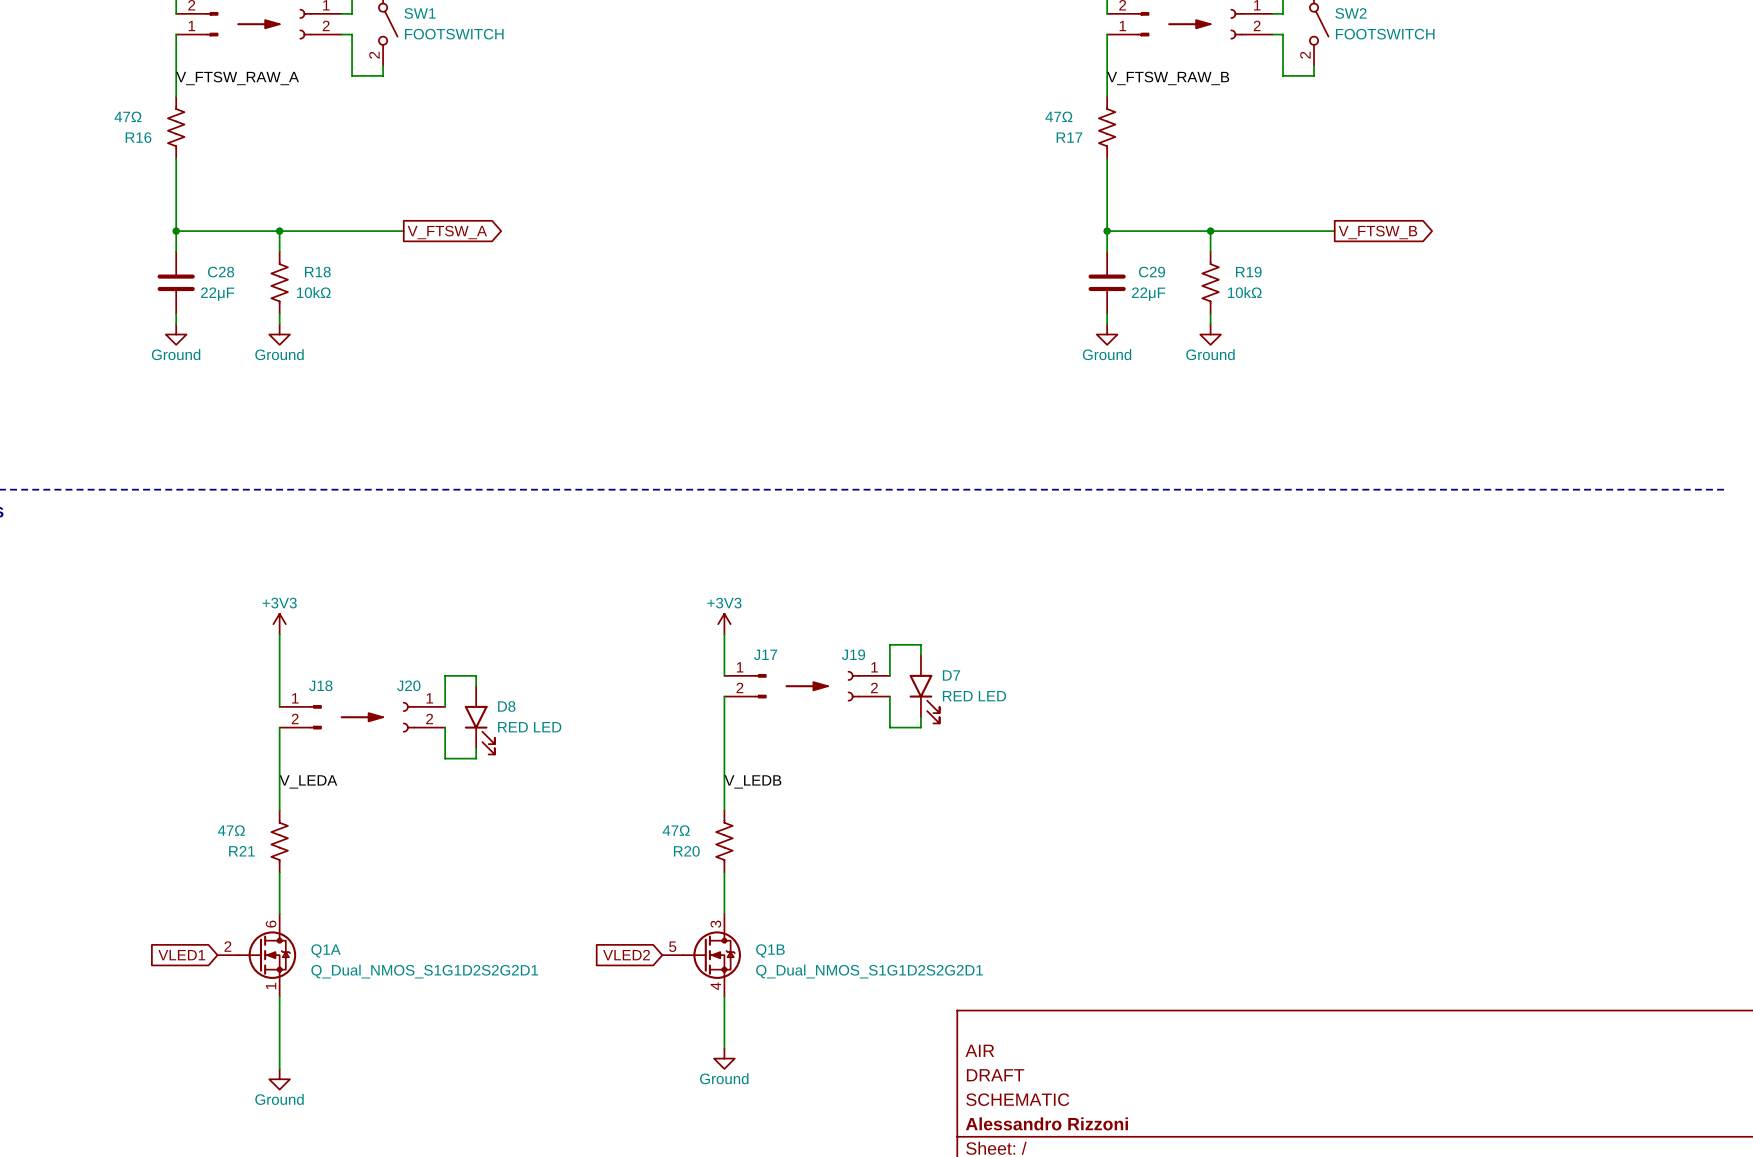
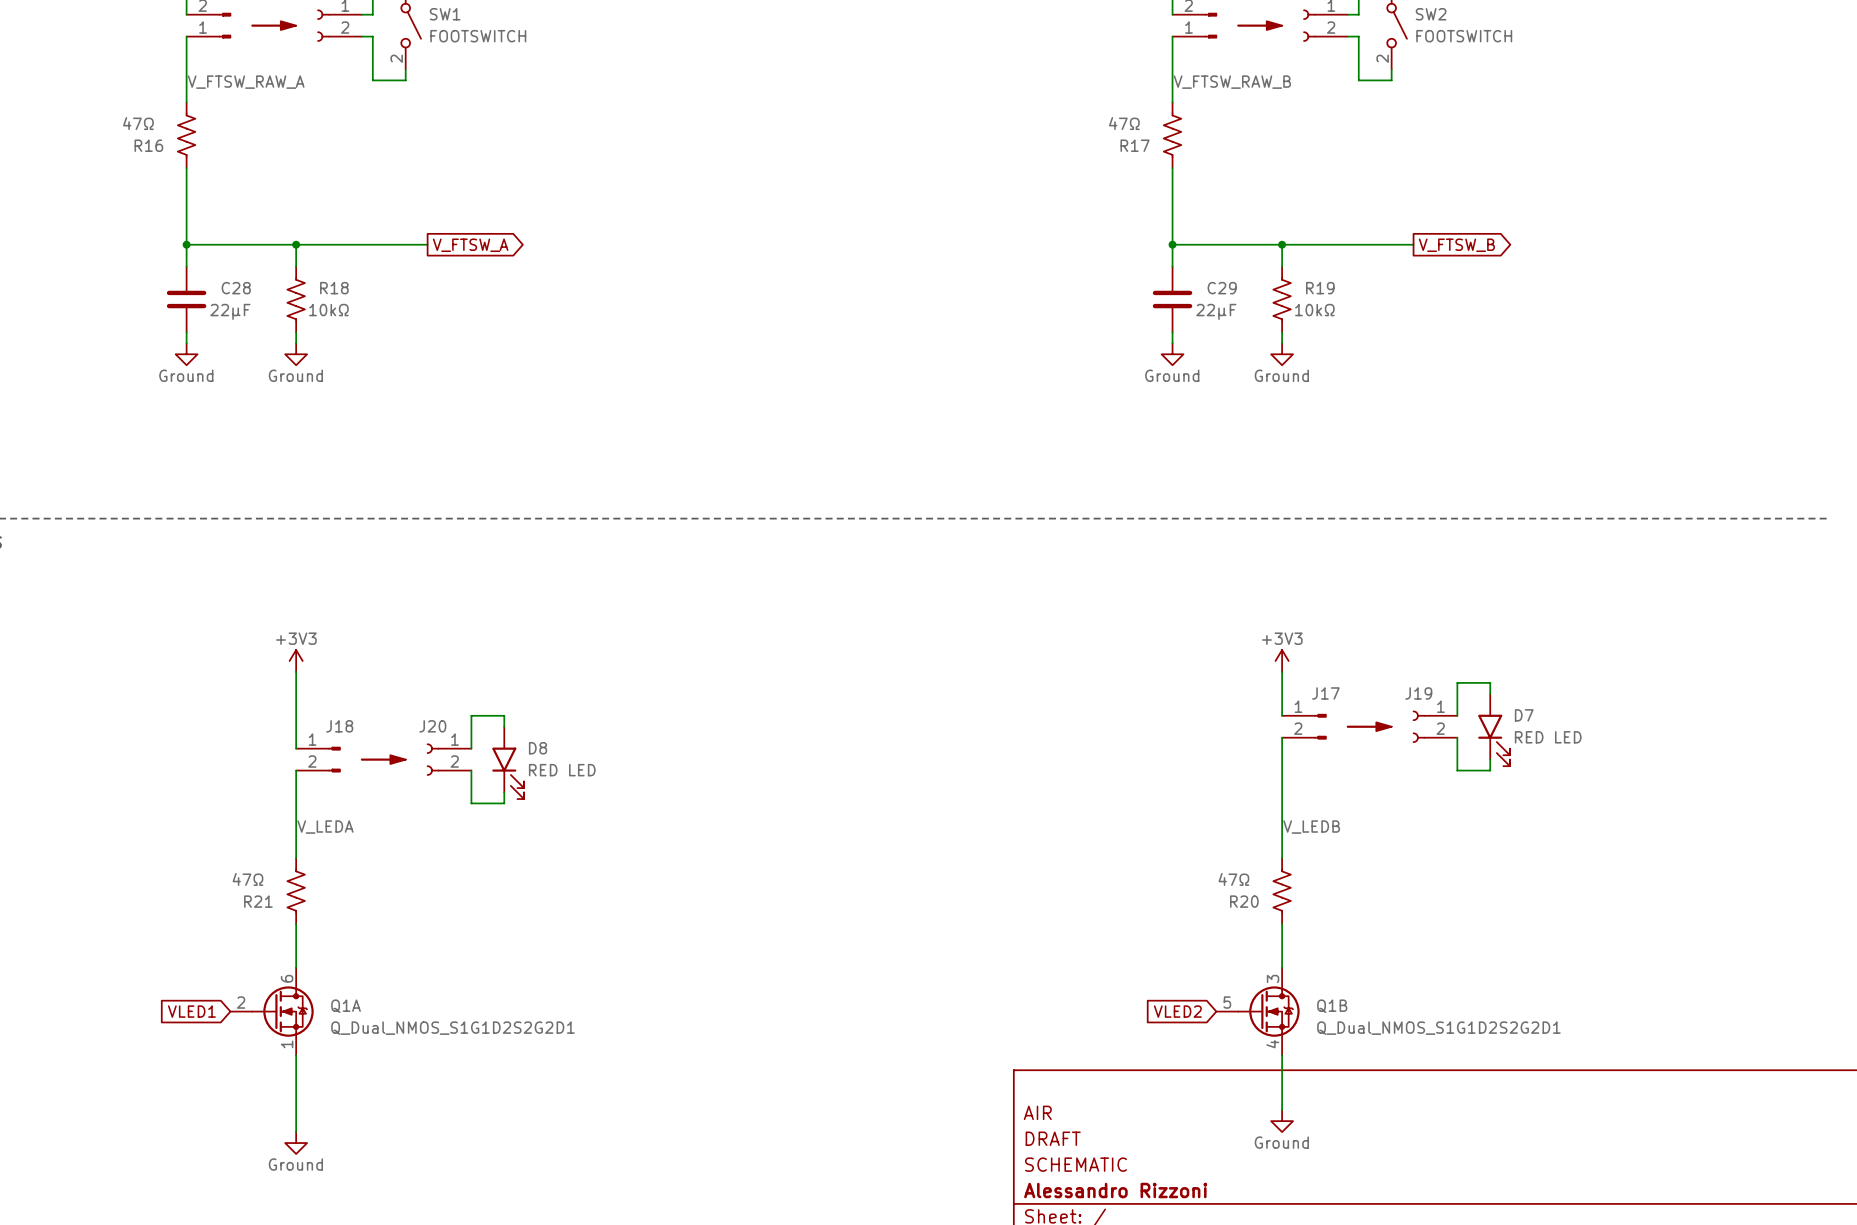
power symbol: +3V3 (724, 624) -> none
power symbol: none -> +3V3 (1282, 661)
wire: (724, 634) (724, 675) -> none
wire: none -> (1282, 671) (1282, 715)
wire: (920, 655) (920, 644) (889, 644) (889, 675) -> none
wire: none -> (1490, 693) (1490, 682) (1457, 682) (1457, 715)
J17 position: (745, 686) -> (1304, 726)
power symbol: (806, 686) -> none
J19 position: (868, 686) -> (1435, 726)
power symbol: none -> (1369, 726)
D7 position: (924, 689) -> (1494, 730)
wire: (724, 696) (724, 810) -> none
wire: (889, 696) (889, 727) (920, 727) (920, 717) -> none
wire: none -> (1282, 737) (1282, 858)
wire: none -> (1457, 737) (1457, 770) (1490, 770) (1490, 759)
label: V_LEDB (752, 781) -> none
label: none -> V_LEDB (1311, 827)
R20 position: (724, 841) -> (1282, 891)
wire: (724, 872) (724, 913) -> none
wire: none -> (1282, 923) (1282, 967)
global label: VLED2 (626, 955) -> none
Q1B position: (701, 955) -> (1257, 1011)
global label: none -> VLED2 (1177, 1011)
wire: (724, 996) (724, 1048) -> none
wire: none -> (1282, 1055) (1282, 1110)
power symbol: Ground (724, 1058) -> none
power symbol: none -> Ground (1282, 1121)

